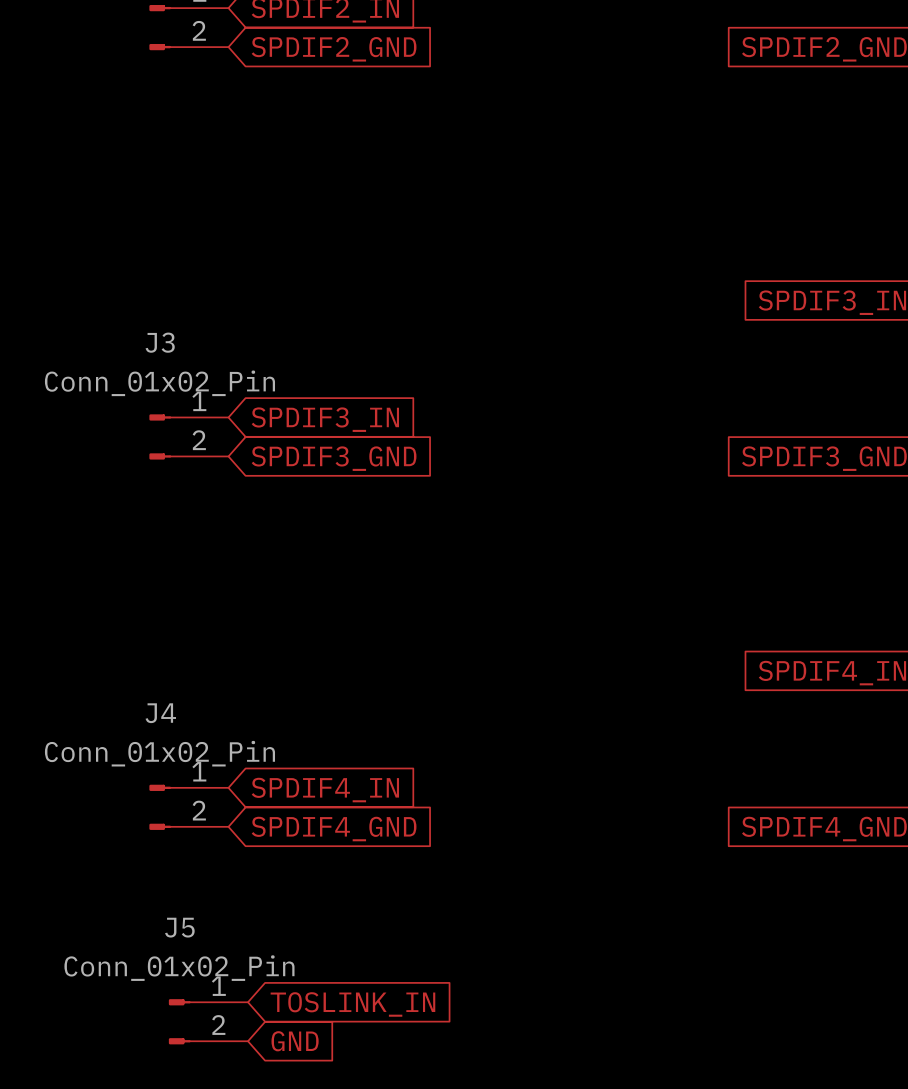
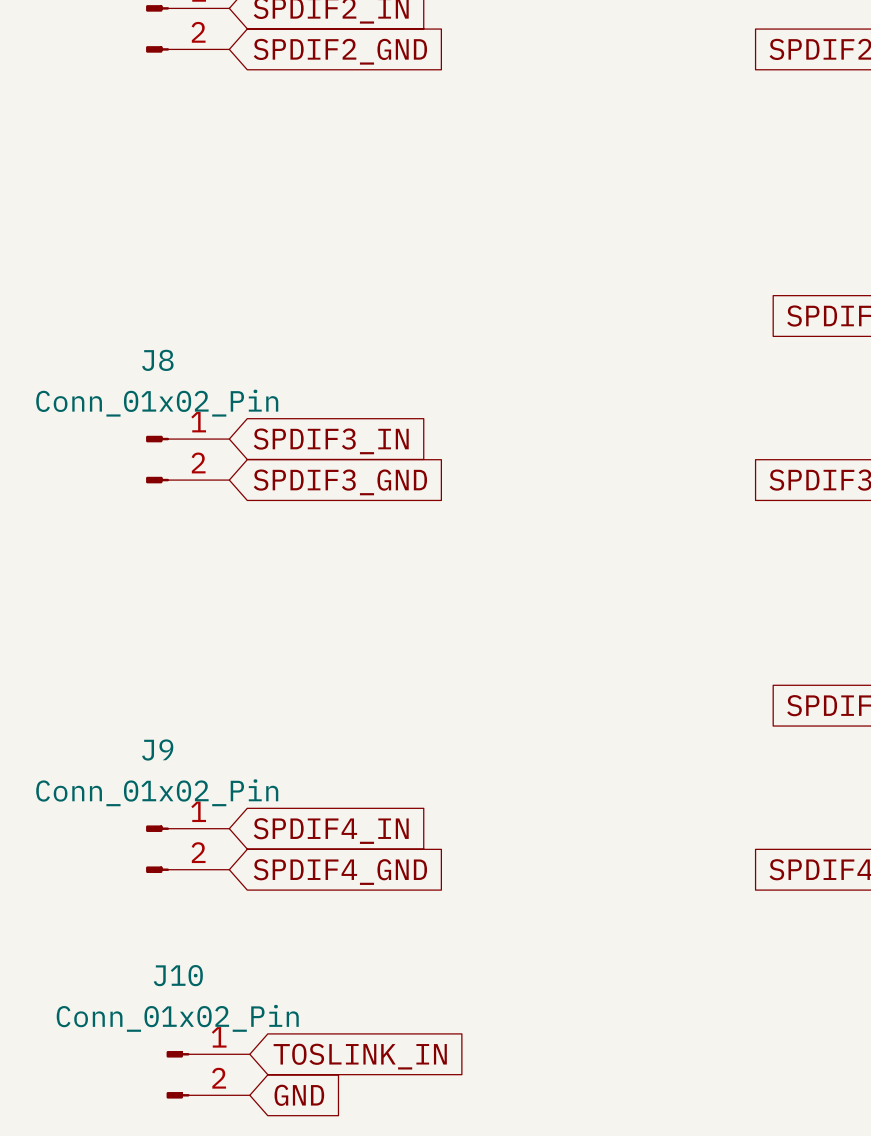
J3 name: J3 (160, 342) -> J8 (157, 360)
J4 name: J4 (160, 713) -> J9 (157, 750)
J5 name: J5 (179, 927) -> J10 (178, 975)

